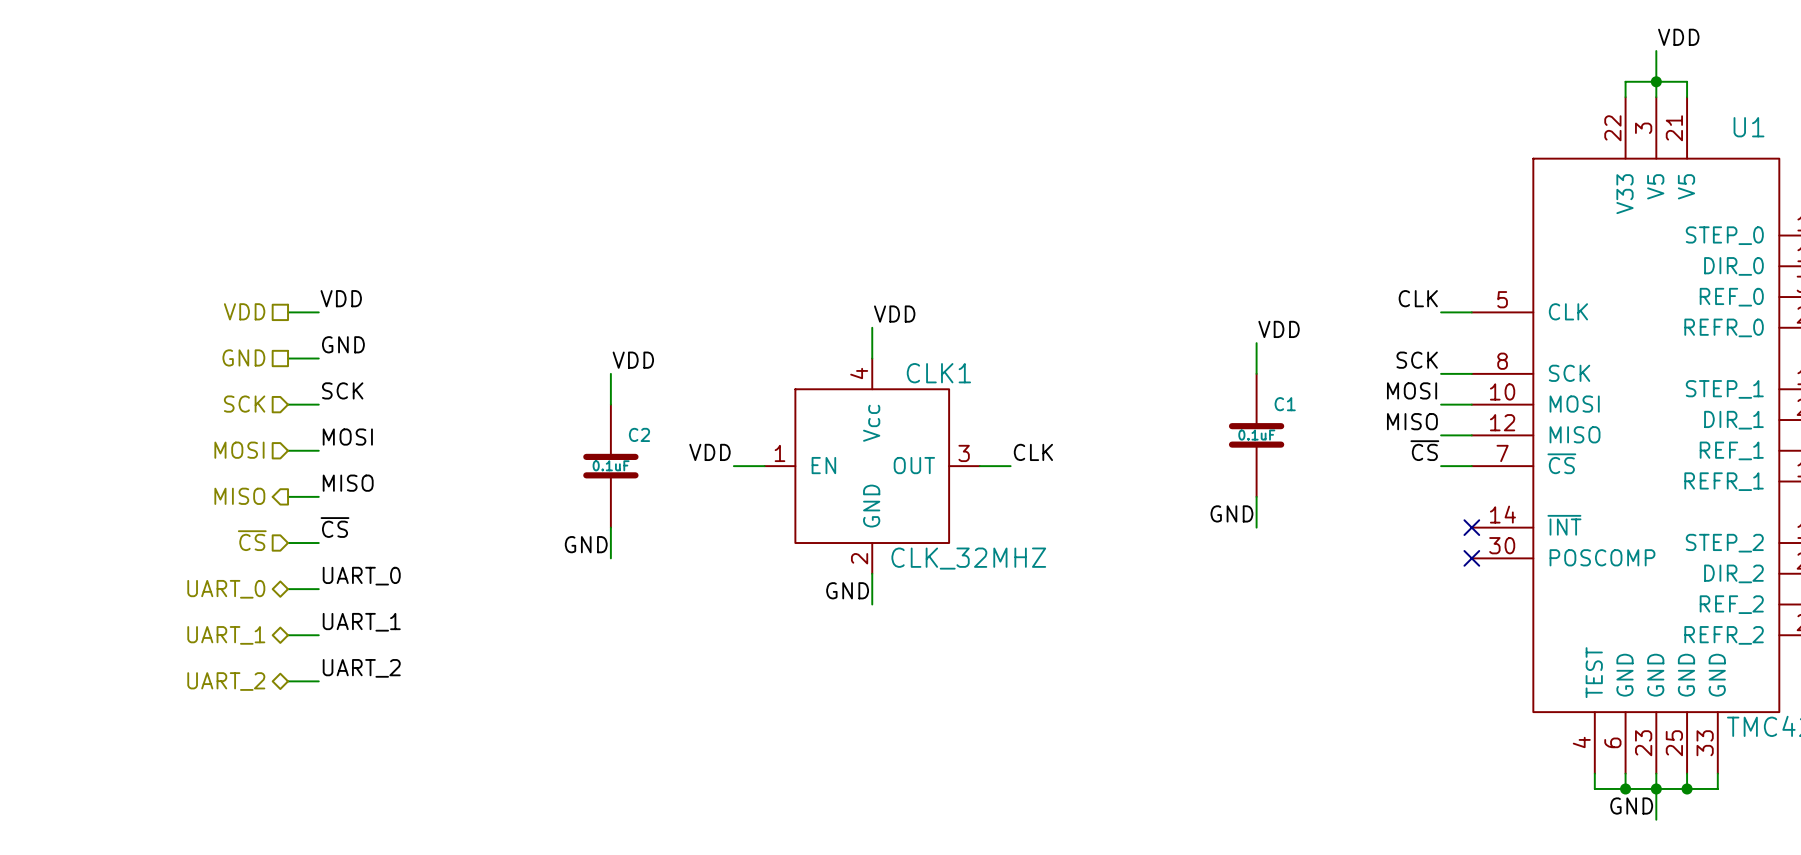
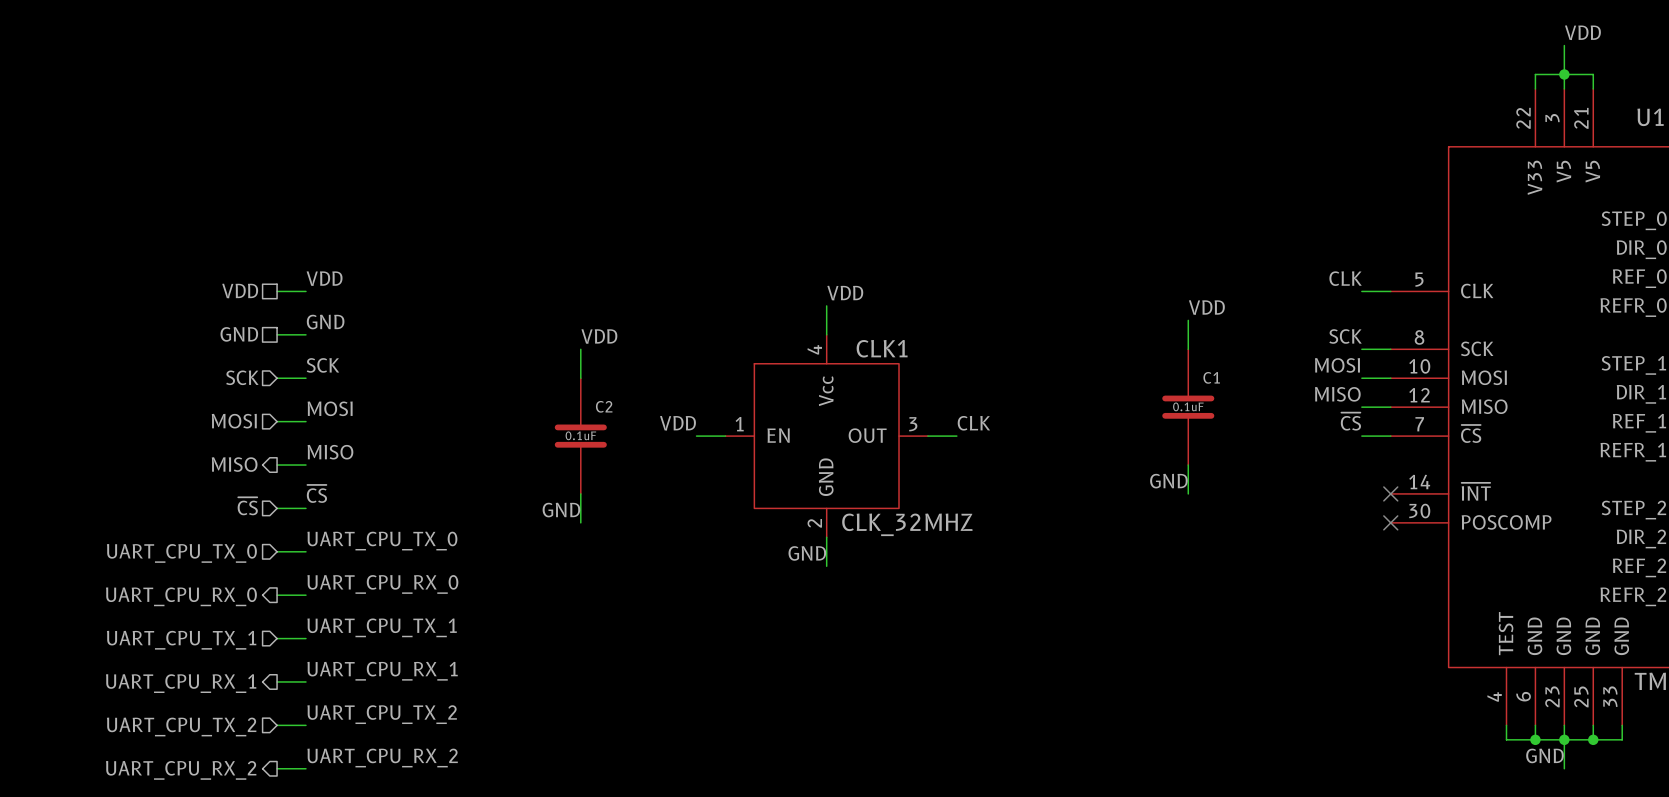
label: UART_0 (361, 576) -> UART_CPU_TX_0 (382, 541)
hierarchical label shape: bidirectional (226, 589) -> input (181, 553)
hierarchical label: UART_0 (226, 589) -> UART_CPU_TX_0 (181, 553)
label: UART_1 (361, 622) -> UART_CPU_RX_0 (382, 584)
hierarchical label shape: bidirectional (226, 635) -> output (181, 596)
hierarchical label: UART_1 (226, 635) -> UART_CPU_RX_0 (181, 596)
label: UART_2 (361, 668) -> UART_CPU_TX_1 (382, 627)
hierarchical label shape: bidirectional (226, 681) -> input (181, 640)
hierarchical label: UART_2 (226, 681) -> UART_CPU_TX_1 (181, 640)
label: none -> UART_CPU_RX_1 (382, 671)
hierarchical label: none -> UART_CPU_RX_1 (181, 683)
wire: none -> (277, 681) (305, 681)
label: none -> UART_CPU_TX_2 (382, 714)
hierarchical label: none -> UART_CPU_TX_2 (181, 726)
wire: none -> (277, 725) (305, 725)
label: none -> UART_CPU_RX_2 (382, 758)
hierarchical label: none -> UART_CPU_RX_2 (181, 770)
wire: none -> (277, 768) (305, 768)

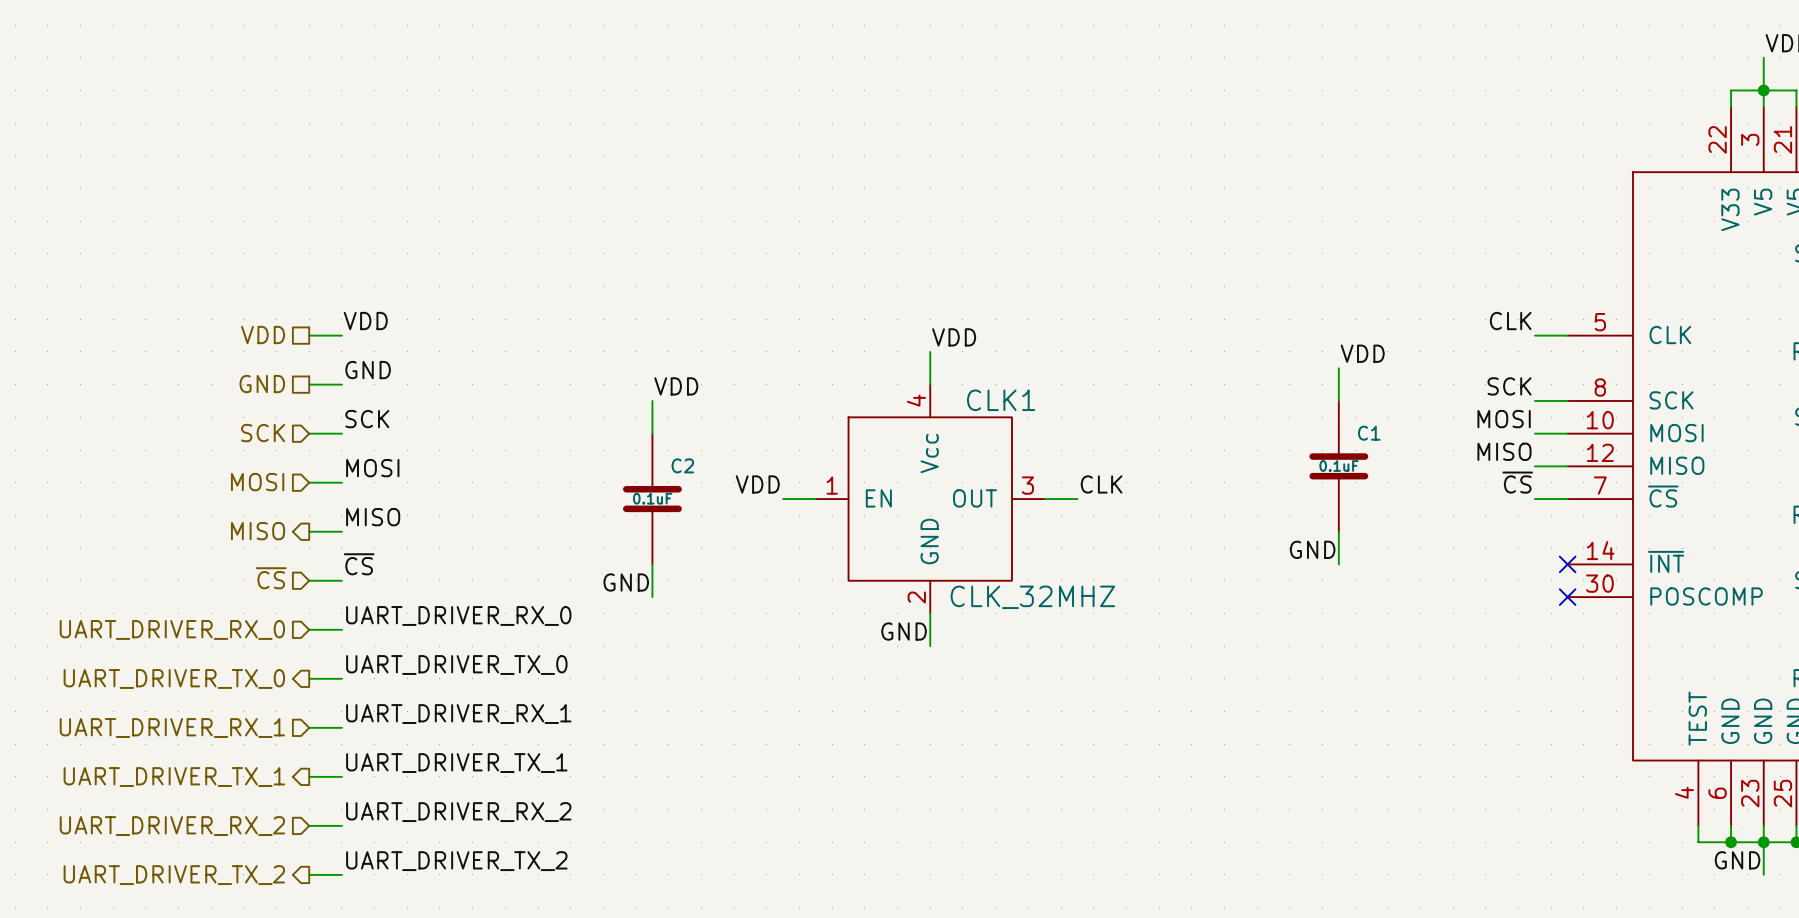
label: UART_CPU_TX_0 (382, 541) -> UART_DRIVER_RX_0 (458, 615)
hierarchical label: UART_CPU_TX_0 (181, 553) -> UART_DRIVER_RX_0 (172, 629)
label: UART_CPU_RX_0 (382, 584) -> UART_DRIVER_TX_0 (456, 665)
hierarchical label: UART_CPU_RX_0 (181, 596) -> UART_DRIVER_TX_0 (174, 678)
label: UART_CPU_TX_1 (382, 627) -> UART_DRIVER_RX_1 (458, 714)
hierarchical label: UART_CPU_TX_1 (181, 640) -> UART_DRIVER_RX_1 (172, 728)
label: UART_CPU_RX_1 (382, 671) -> UART_DRIVER_TX_1 (456, 763)
hierarchical label: UART_CPU_RX_1 (181, 683) -> UART_DRIVER_TX_1 (174, 777)
label: UART_CPU_TX_2 (382, 714) -> UART_DRIVER_RX_2 (458, 812)
hierarchical label: UART_CPU_TX_2 (181, 726) -> UART_DRIVER_RX_2 (172, 826)
label: UART_CPU_RX_2 (382, 758) -> UART_DRIVER_TX_2 (456, 861)
hierarchical label: UART_CPU_RX_2 (181, 770) -> UART_DRIVER_TX_2 (174, 875)

